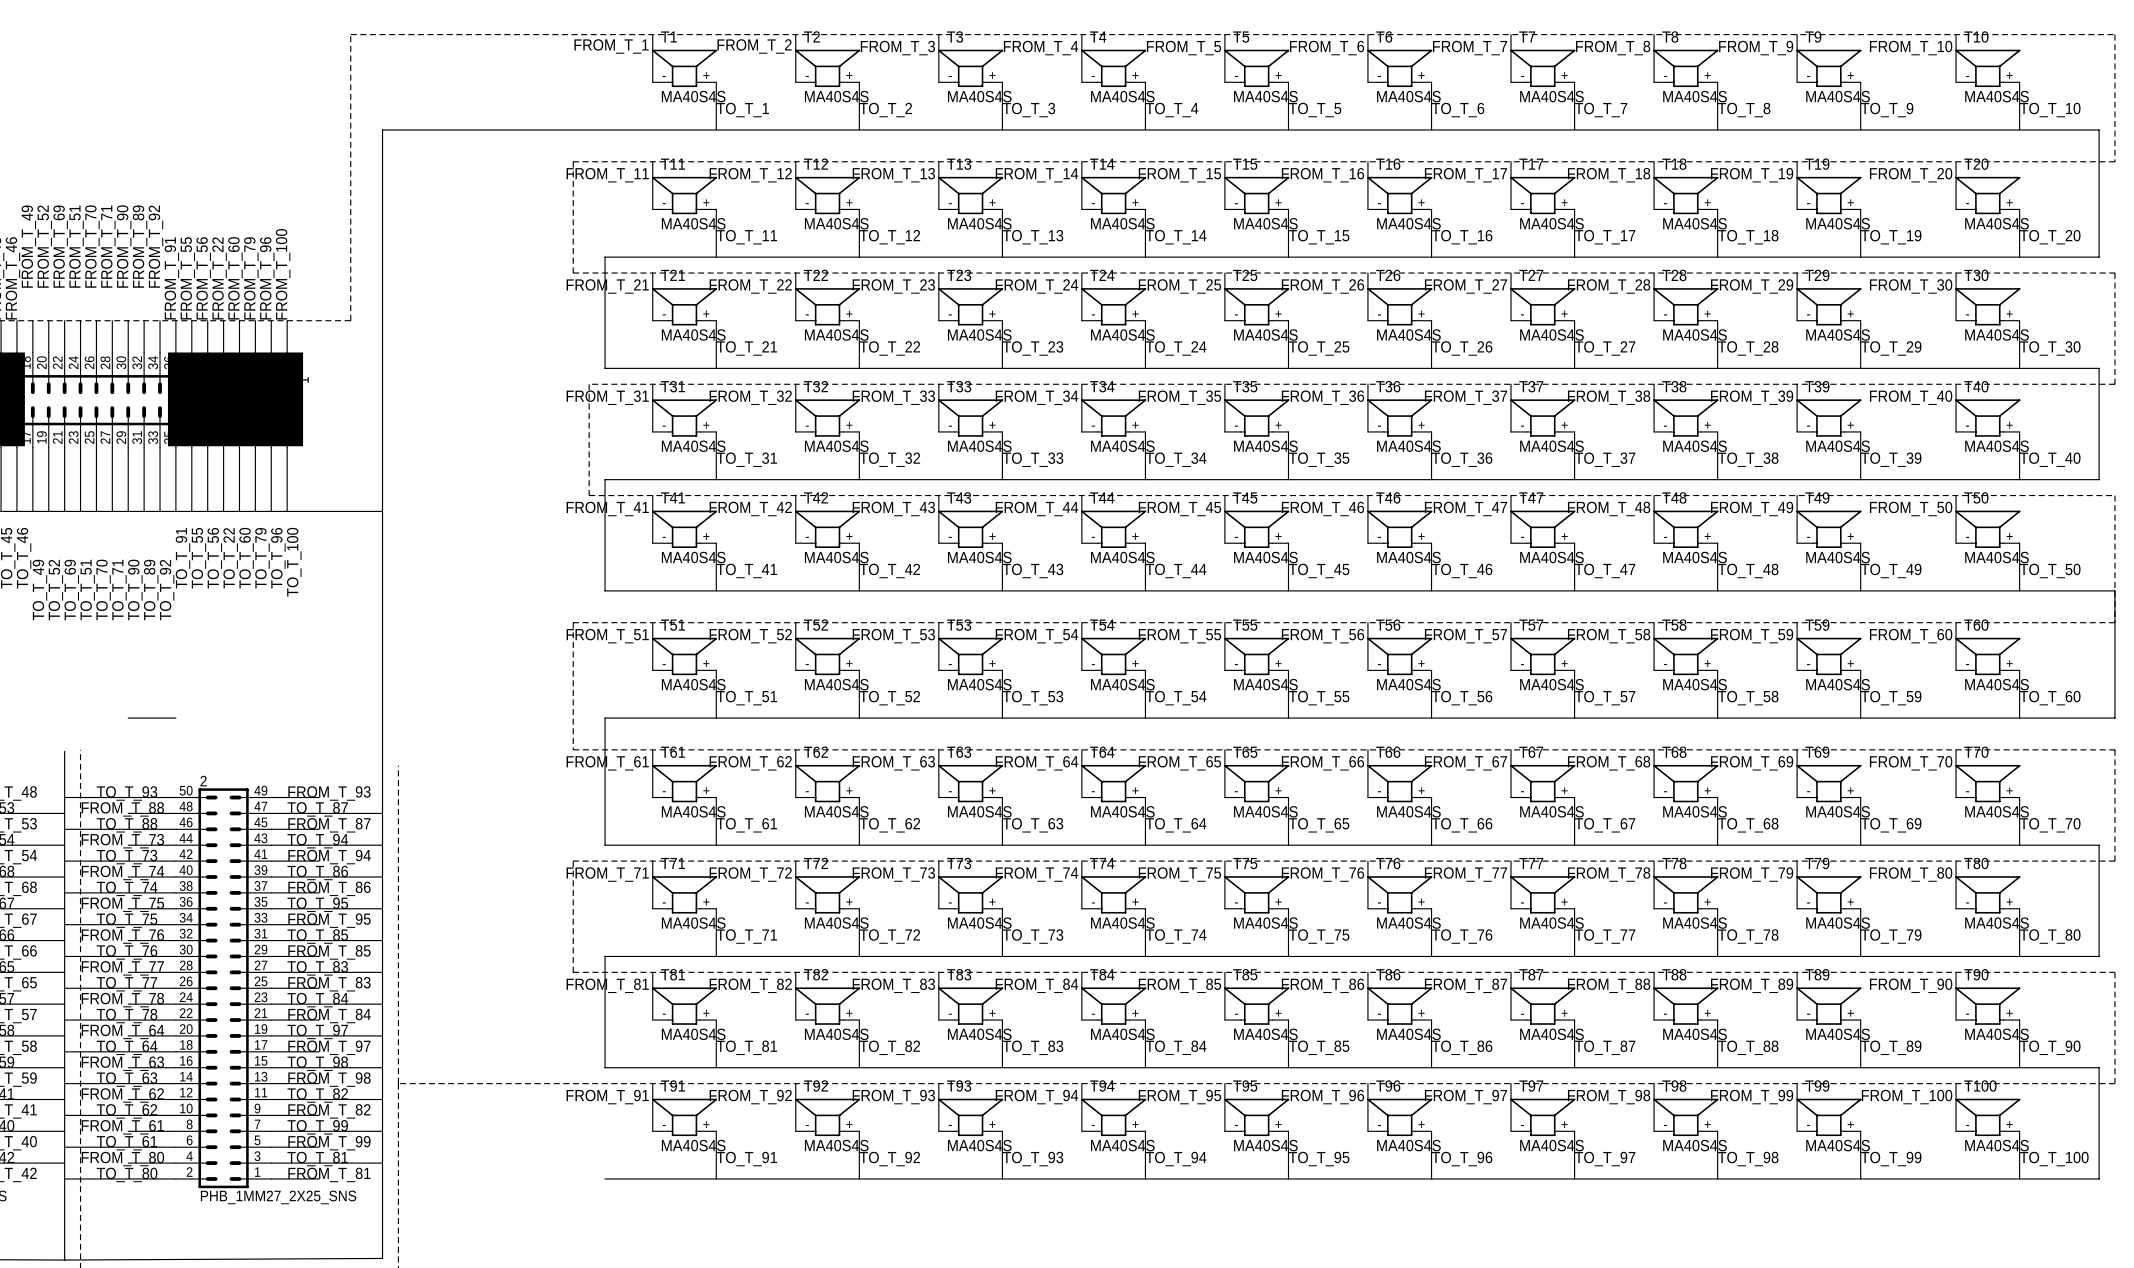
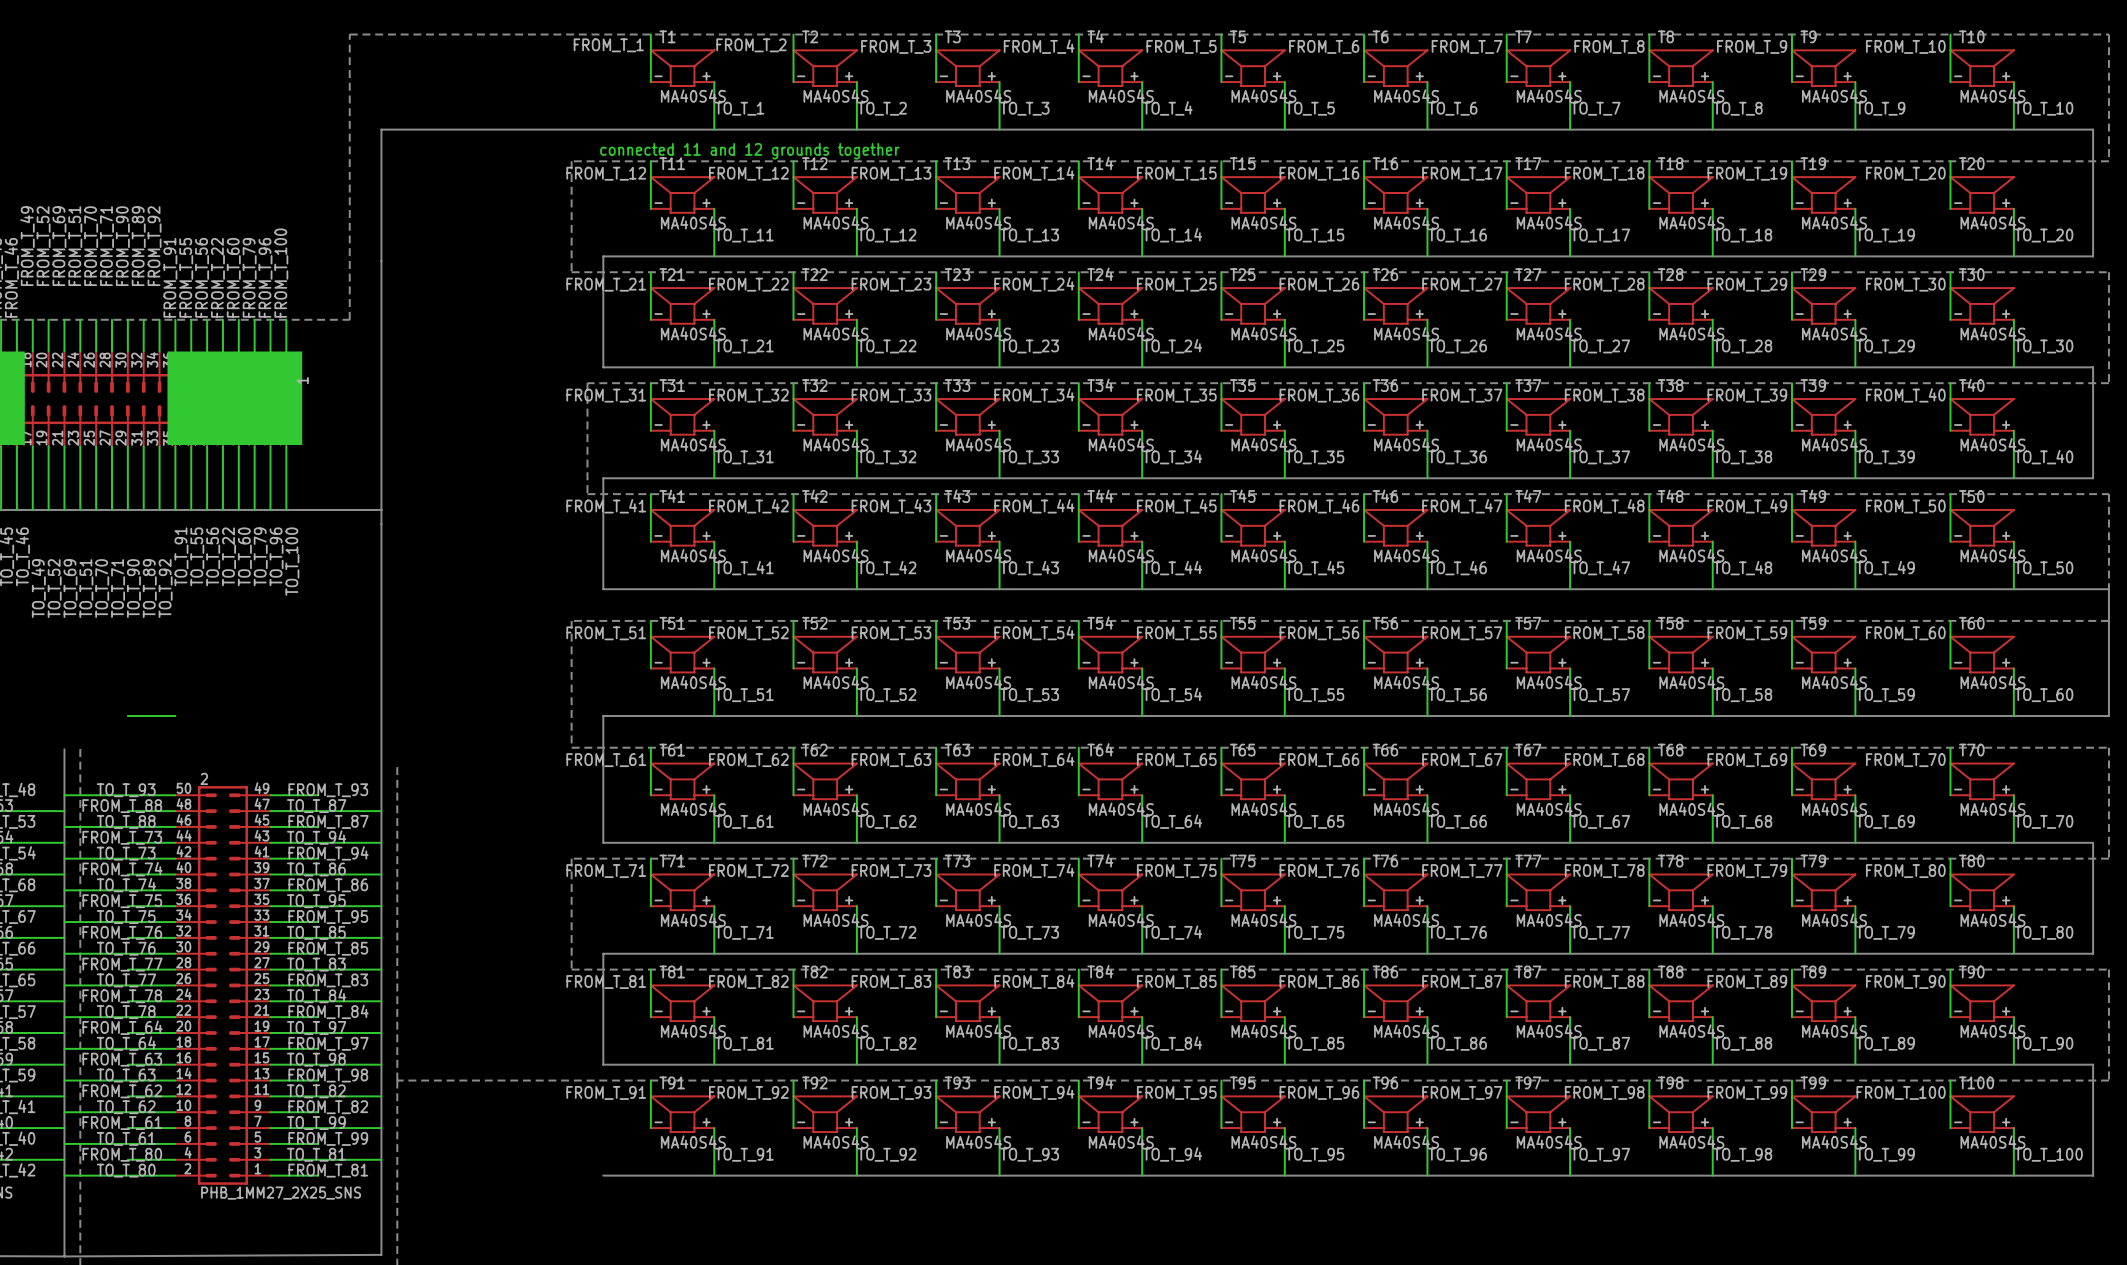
text: none -> connected 11 and 12 grounds together (749, 151)
label: FROM_T_11 (607, 175) -> FROM_T_12 (606, 173)

